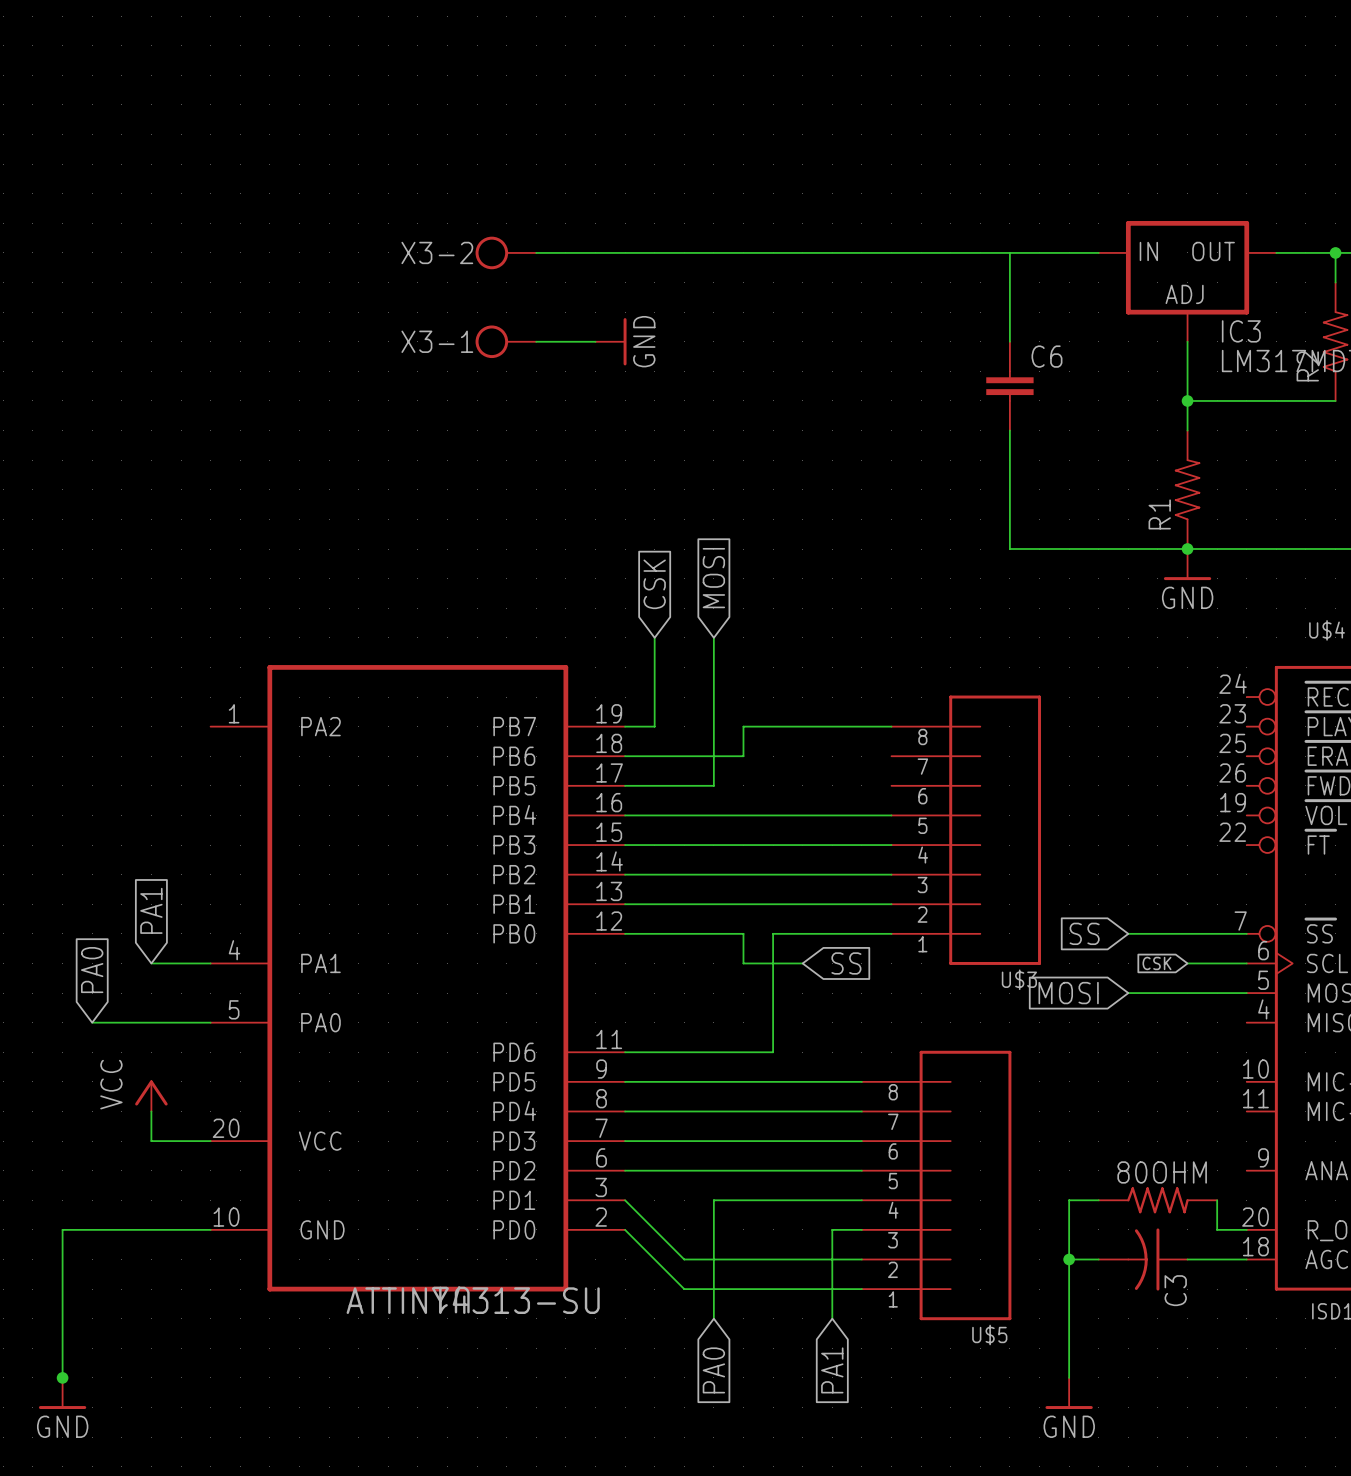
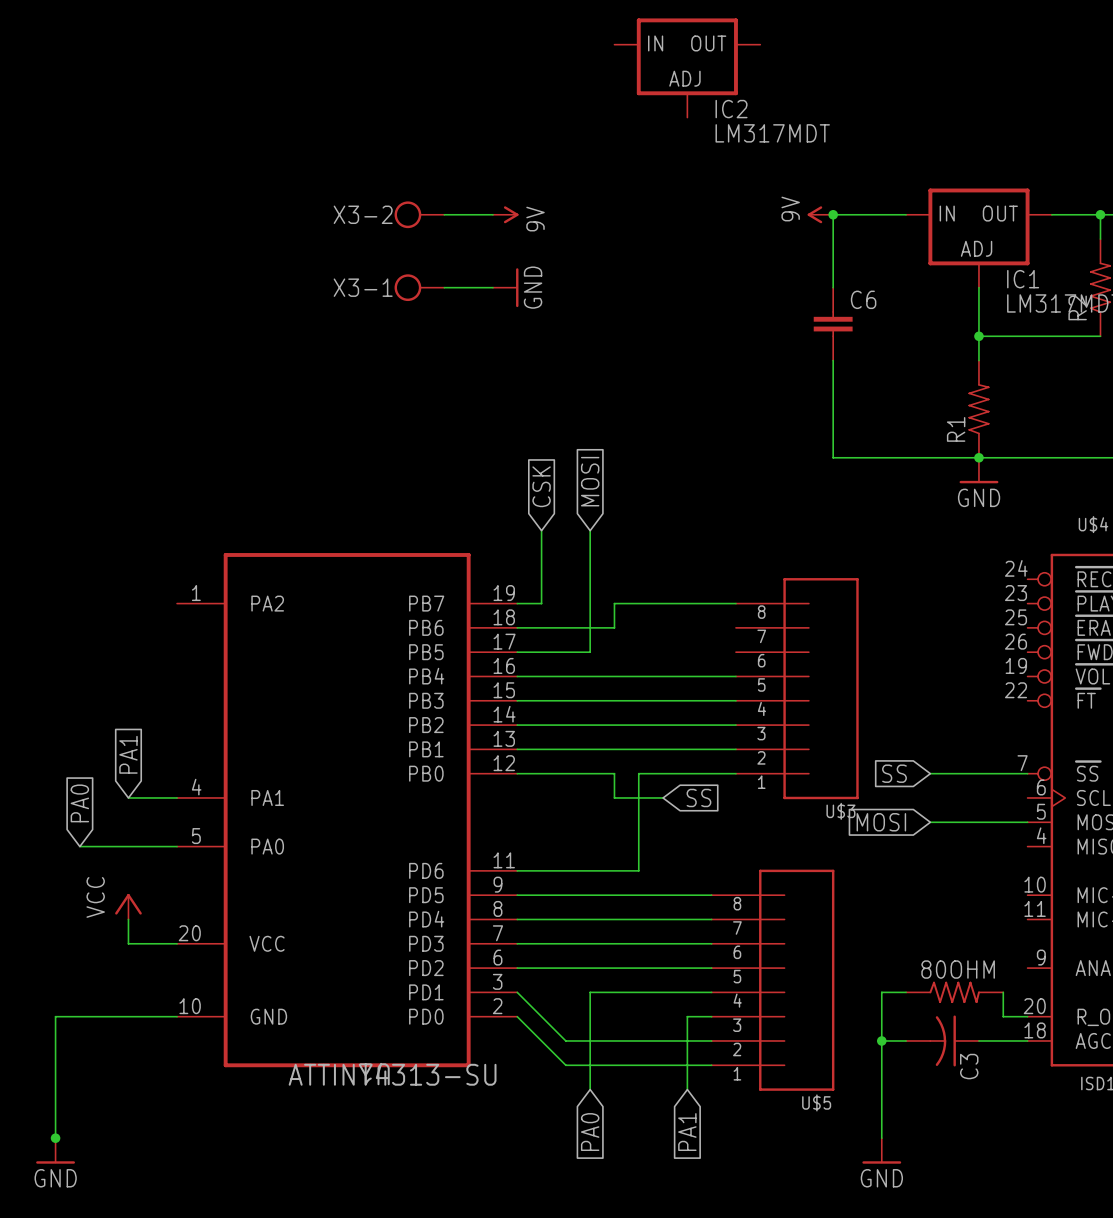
IC2: none -> LM317MDT (687, 68)
wire: (595, 252) (1009, 252) -> none
power symbol: none -> 9V (505, 214)
power symbol: none -> 9V (820, 214)
junction: none -> (833, 214)
IC3 name: IC3 (1241, 331) -> IC1 (1023, 279)
global label: CSK (1156, 963) -> none
wire: (1187, 963) (1246, 963) -> none

